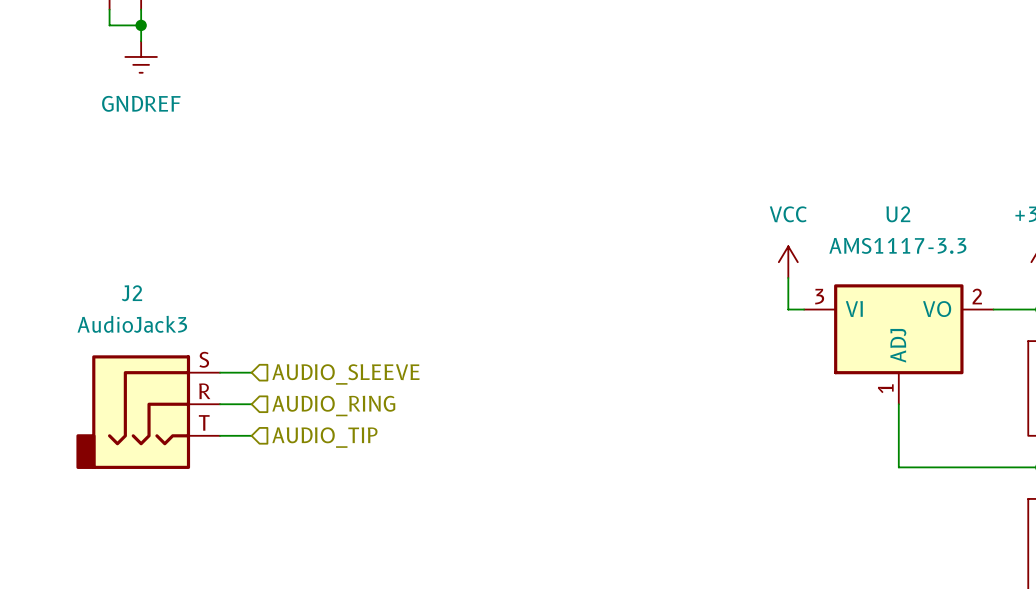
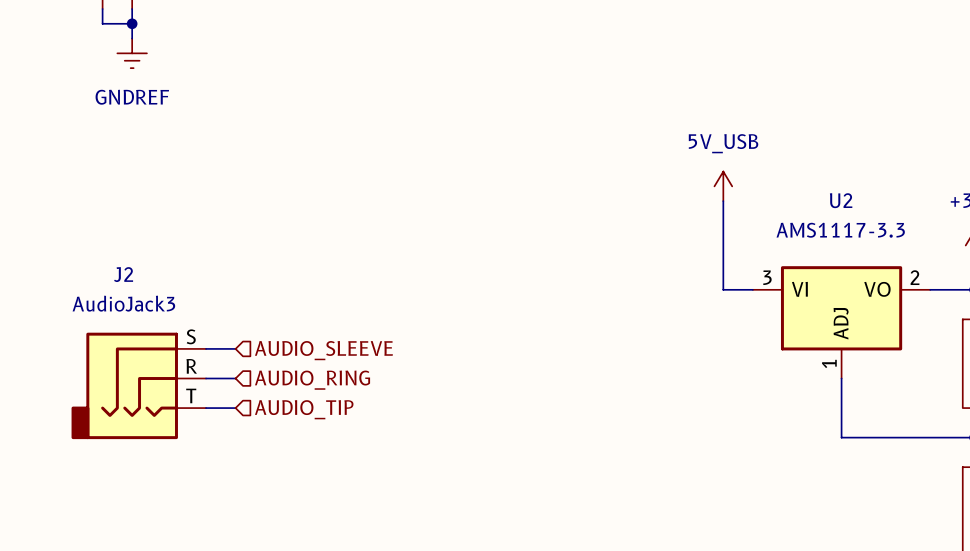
power symbol: none -> 5V_USB (723, 186)
power symbol: VCC (788, 262) -> none
wire: (788, 277) (788, 309) -> (723, 201) (723, 289) (738, 289)

